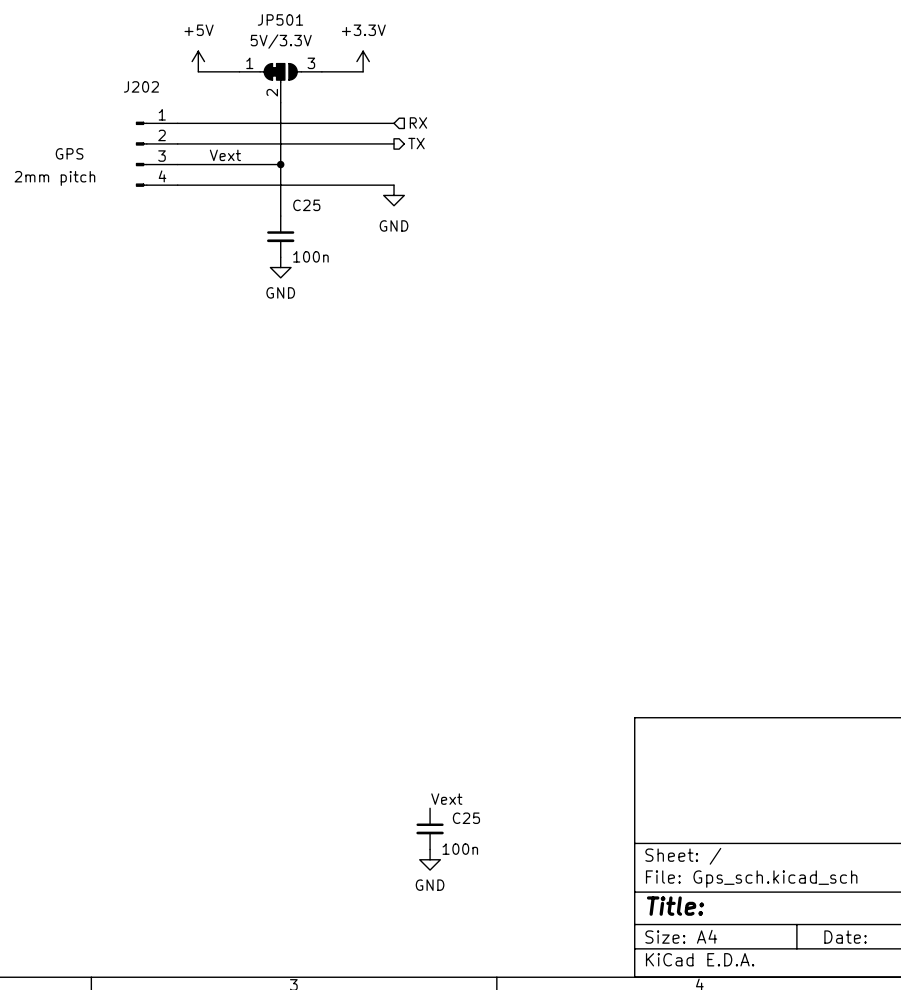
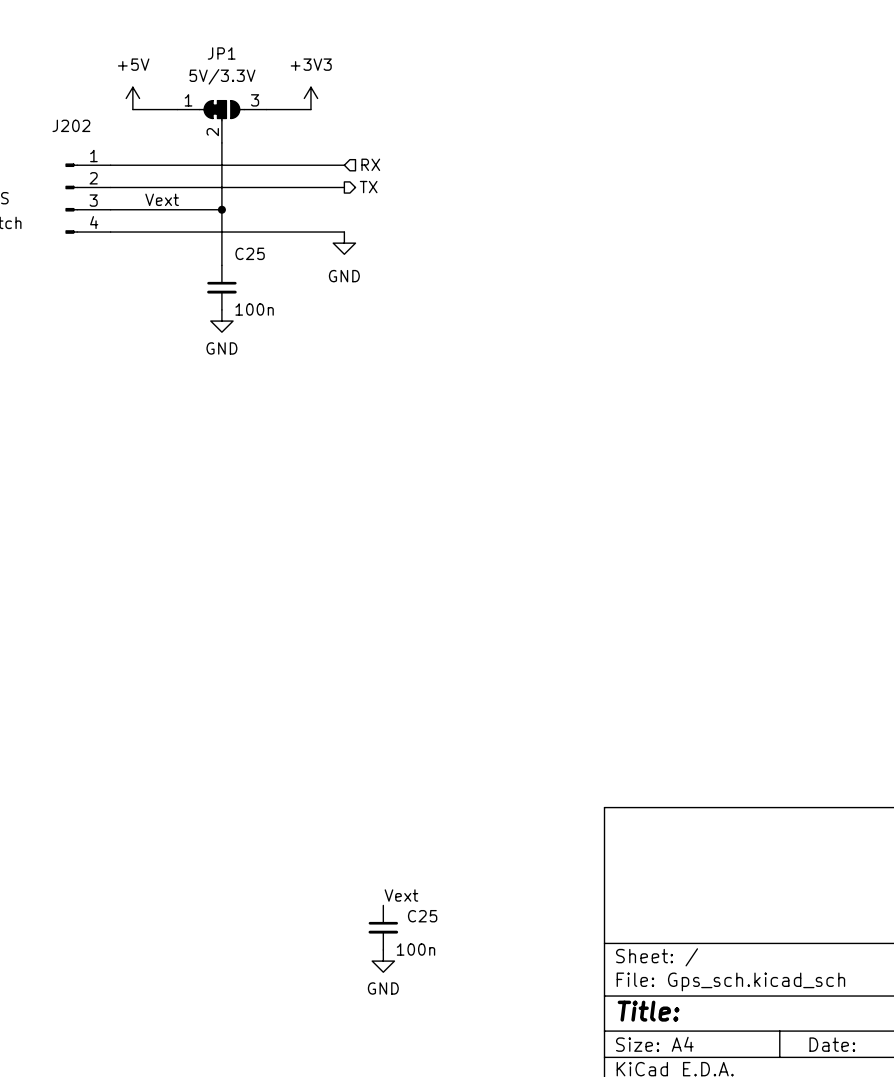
JP501 name: JP501 (280, 19) -> JP1 (221, 53)
power symbol: +3.3V (363, 61) -> +3V3 (310, 98)

